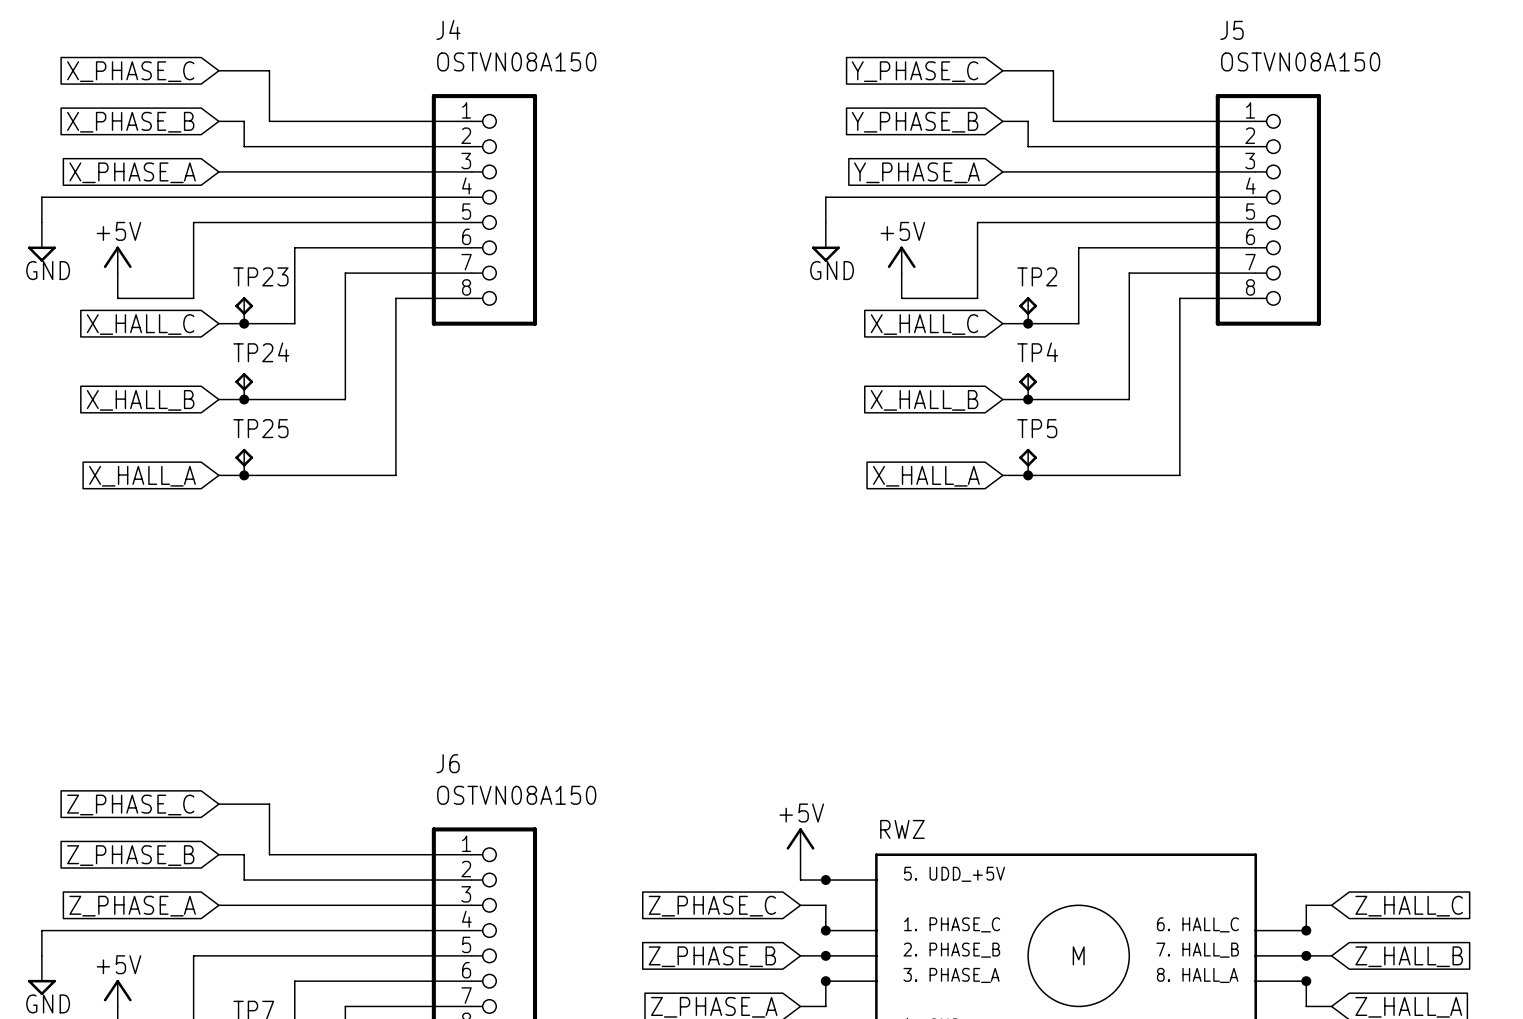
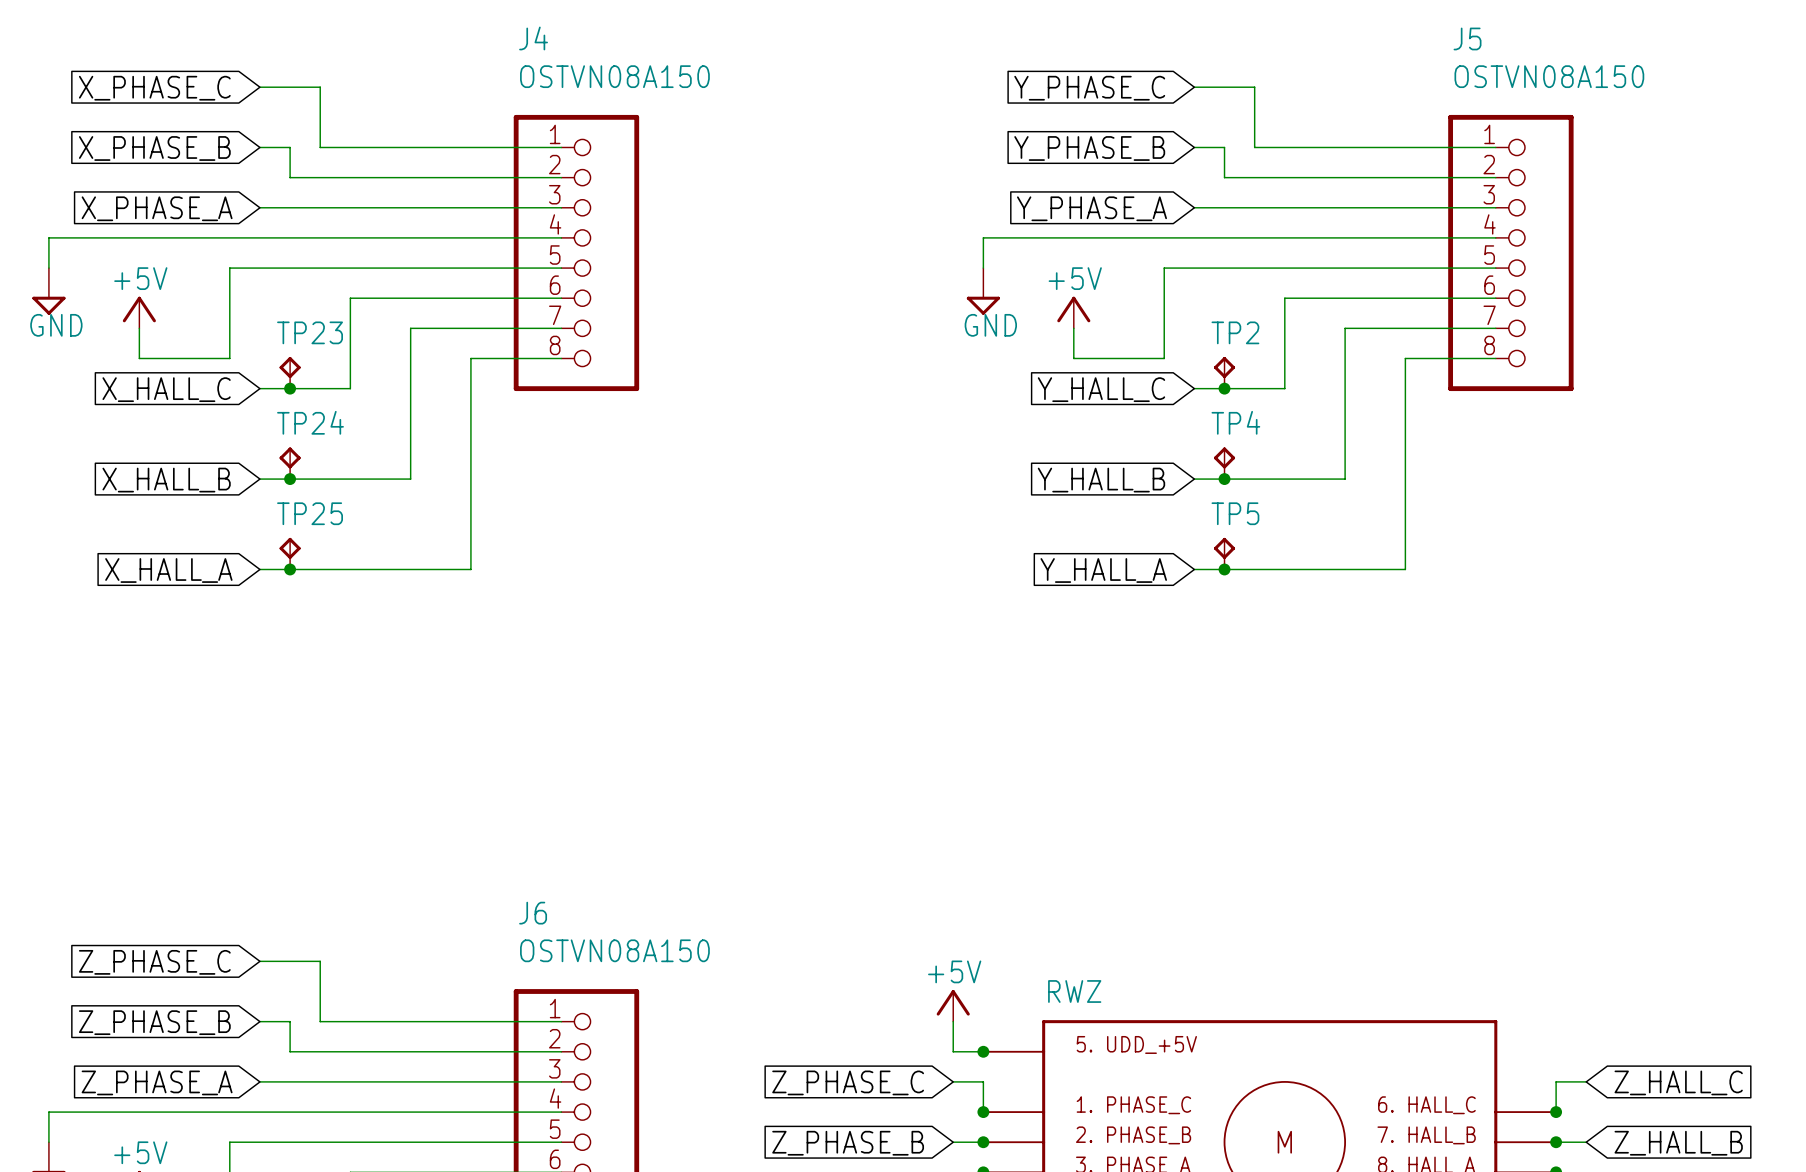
global label: X_HALL_C (924, 324) -> Y_HALL_C (1101, 389)
global label: X_HALL_B (924, 400) -> Y_HALL_B (1101, 480)
global label: X_HALL_A (926, 476) -> Y_HALL_A (1103, 570)

